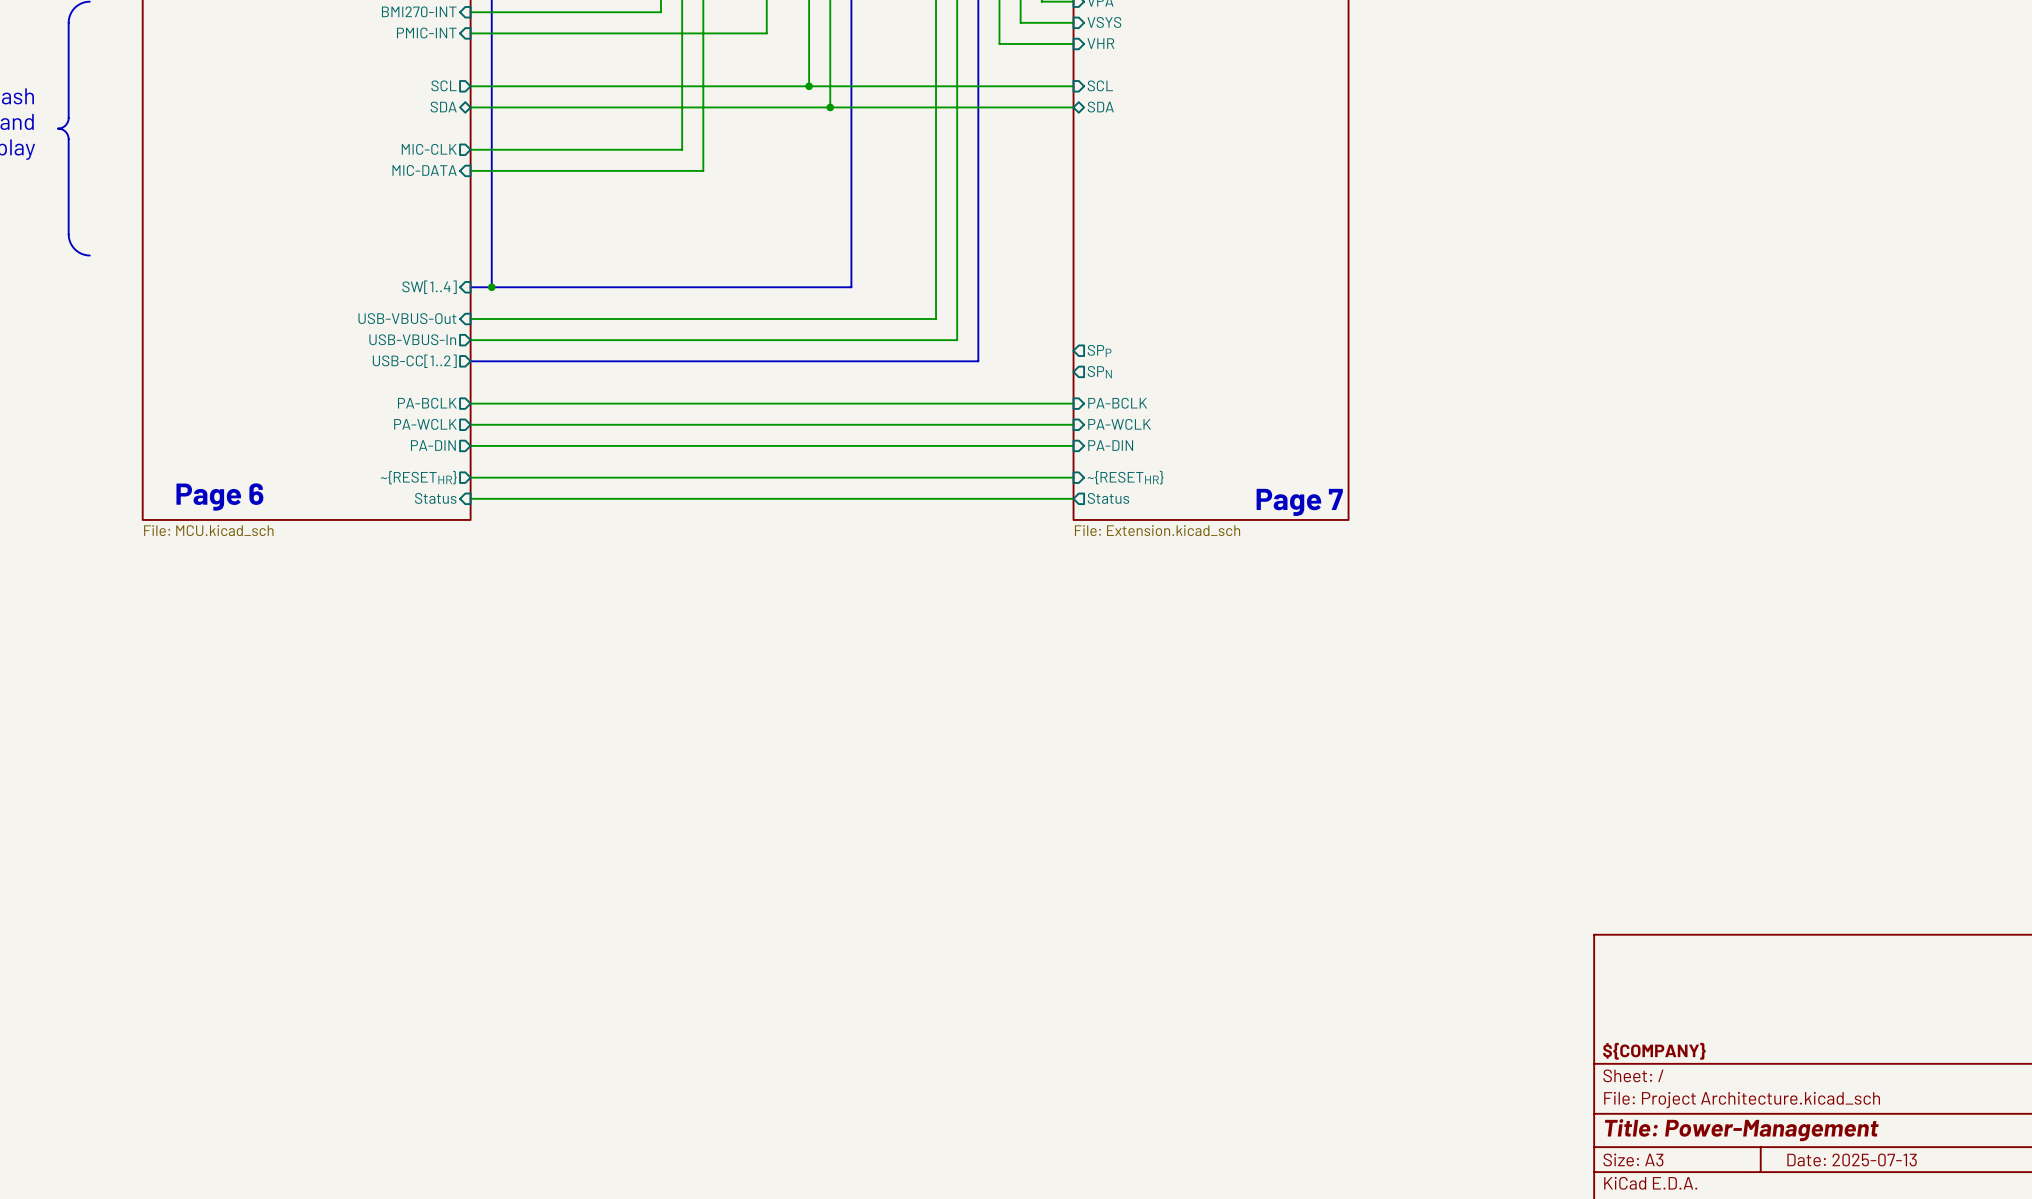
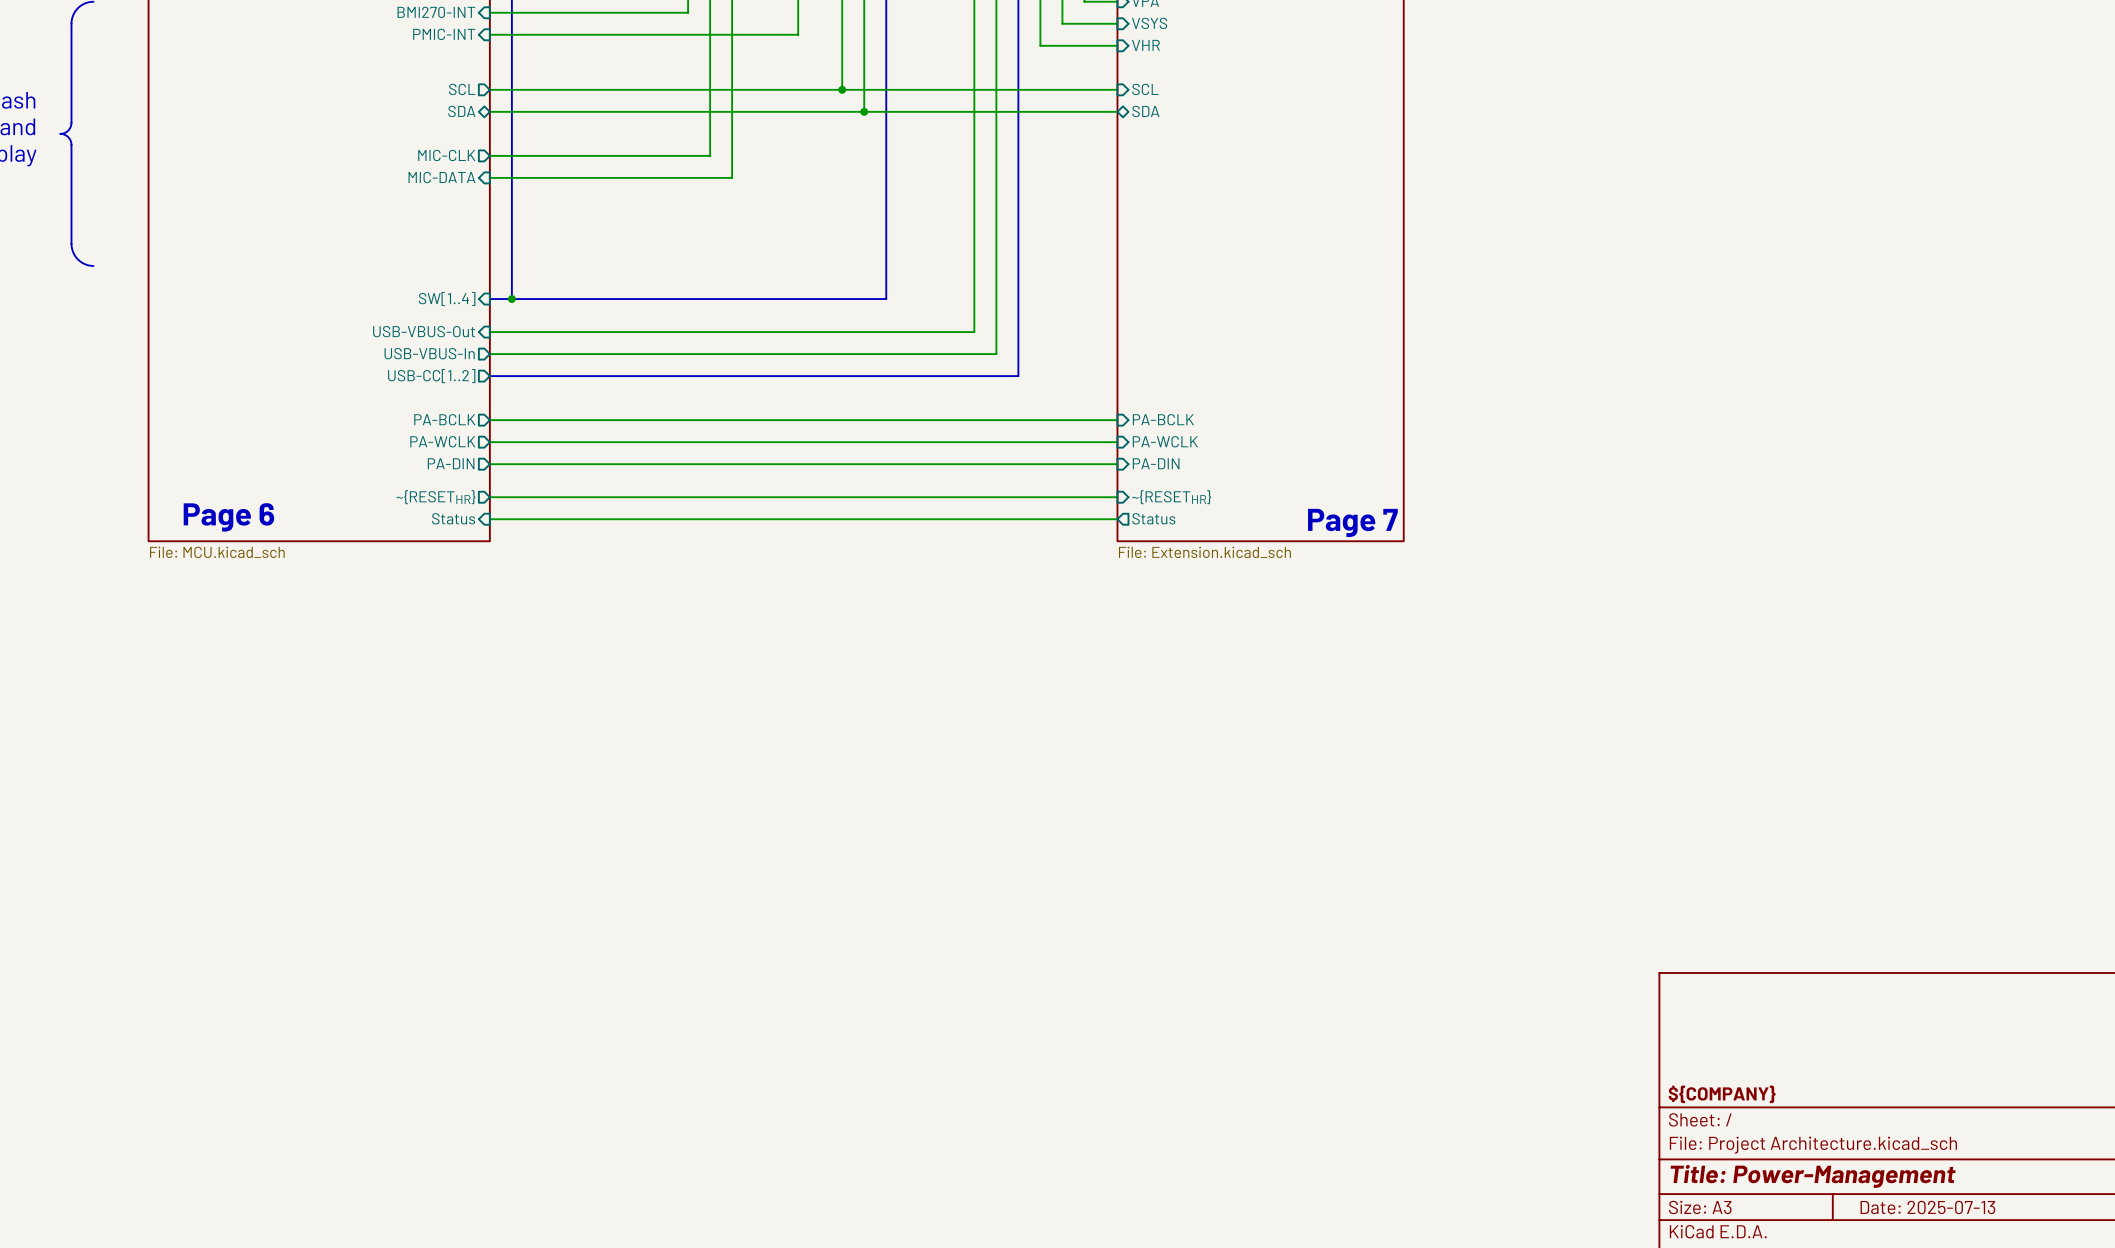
sheet pin: SPP (1099, 351) -> none
sheet pin: SPN (1099, 372) -> none

